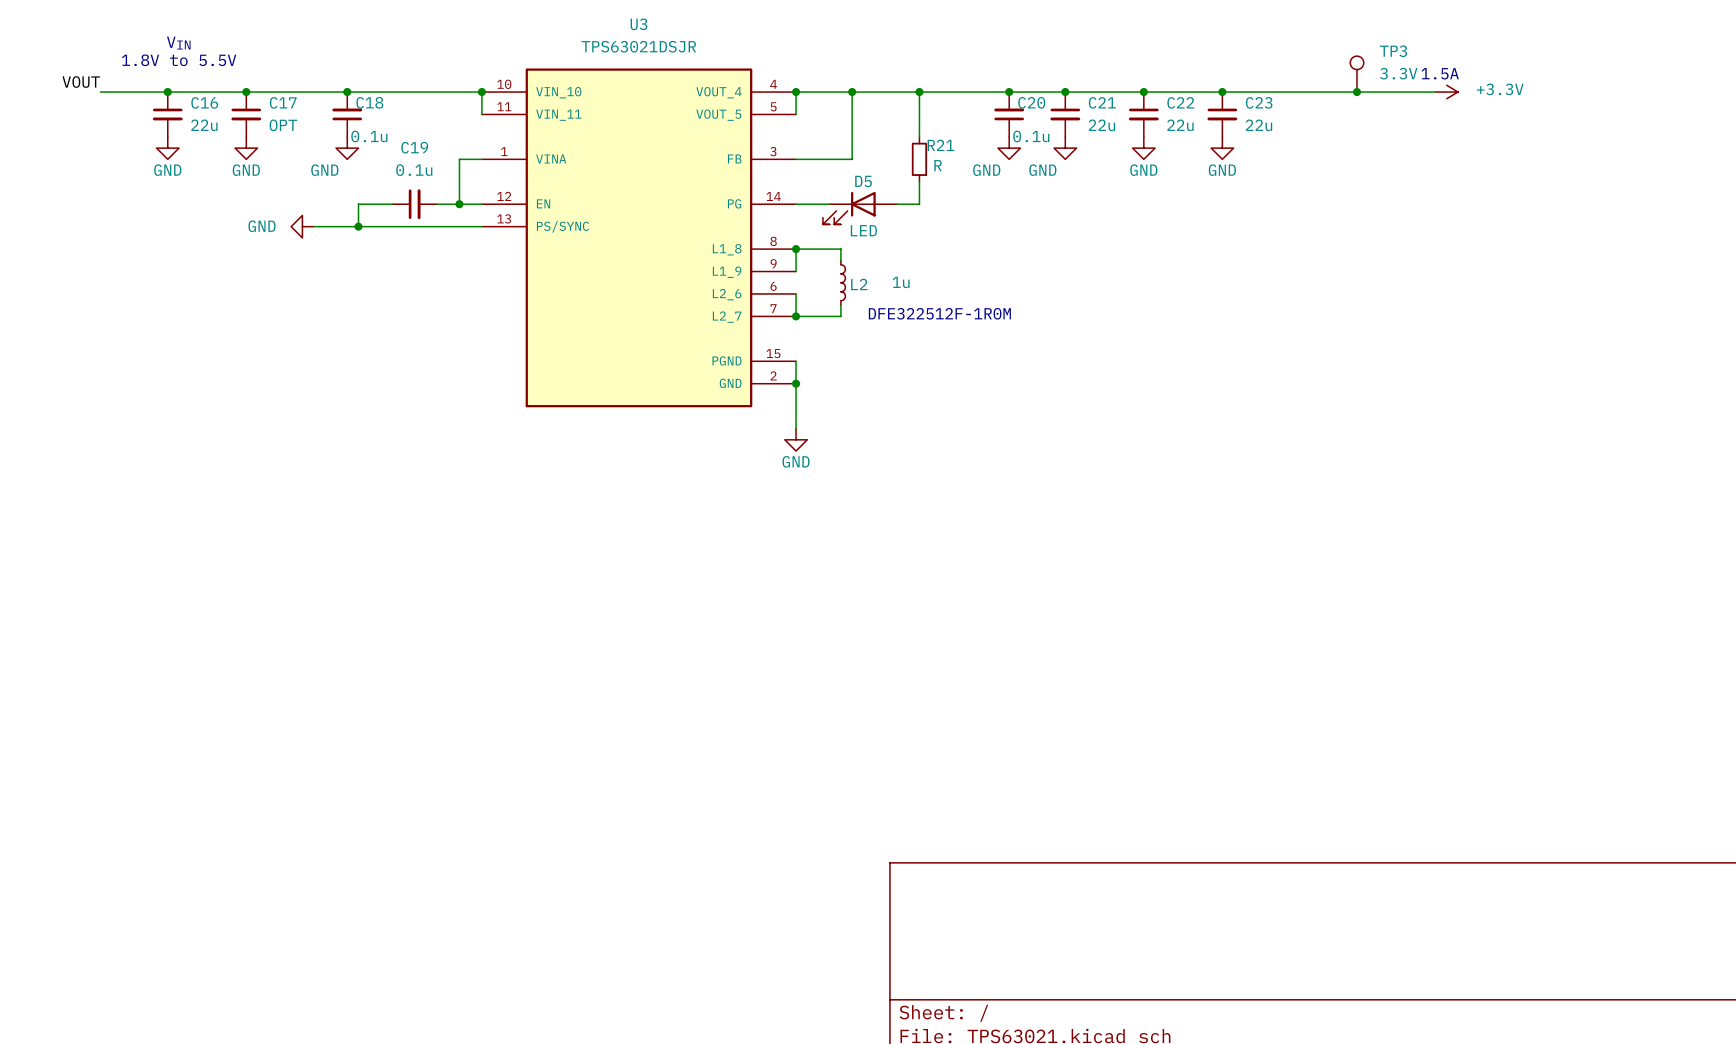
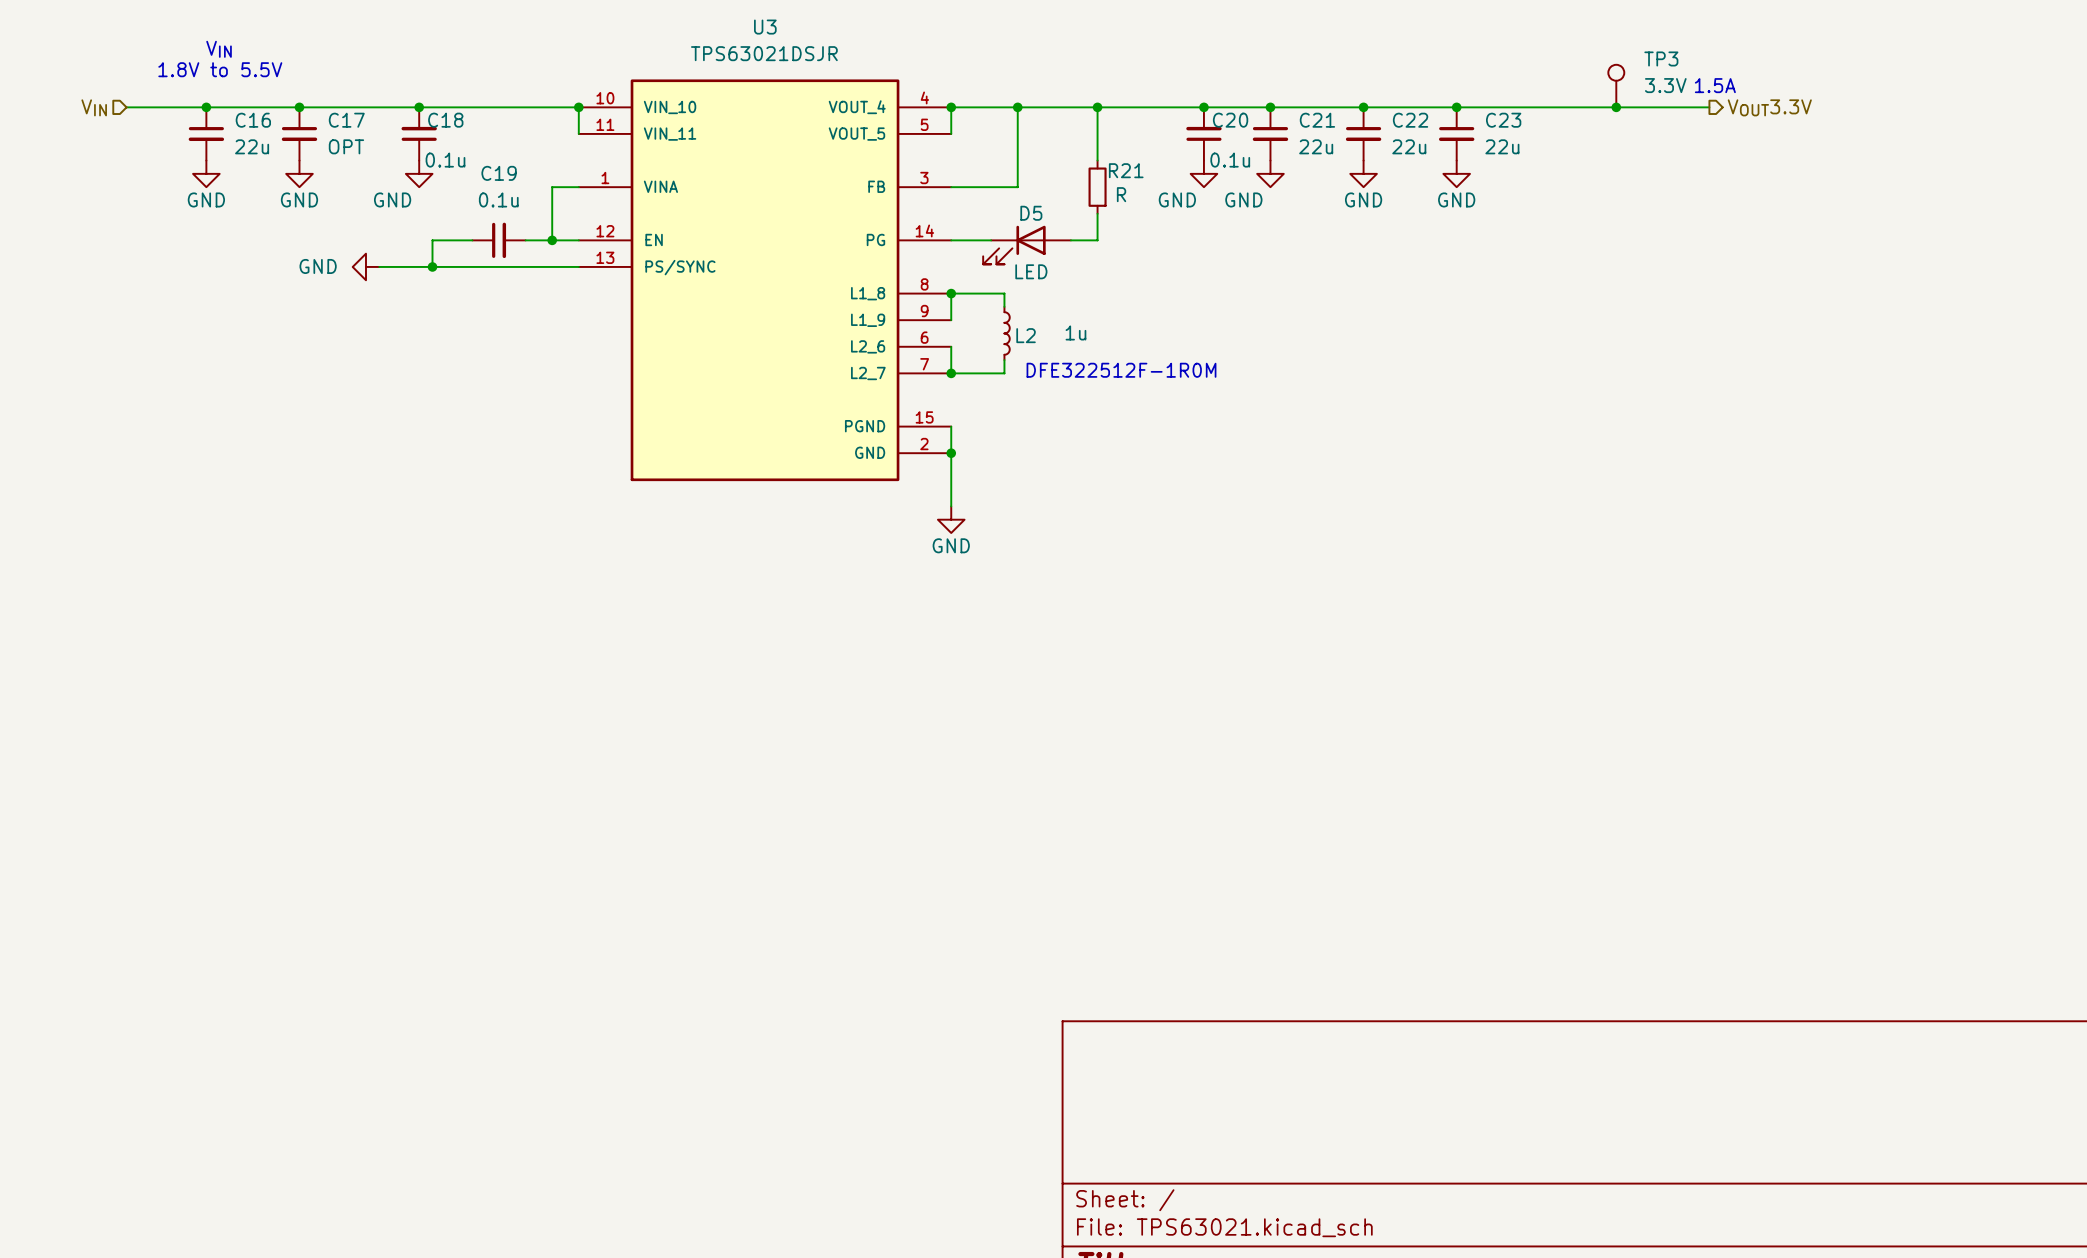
label: VOUT (81, 82) -> none
hierarchical label: none -> VIN (94, 107)
power symbol: +3.3V (1446, 92) -> none
hierarchical label: none -> VOUT3.3V (1769, 107)

